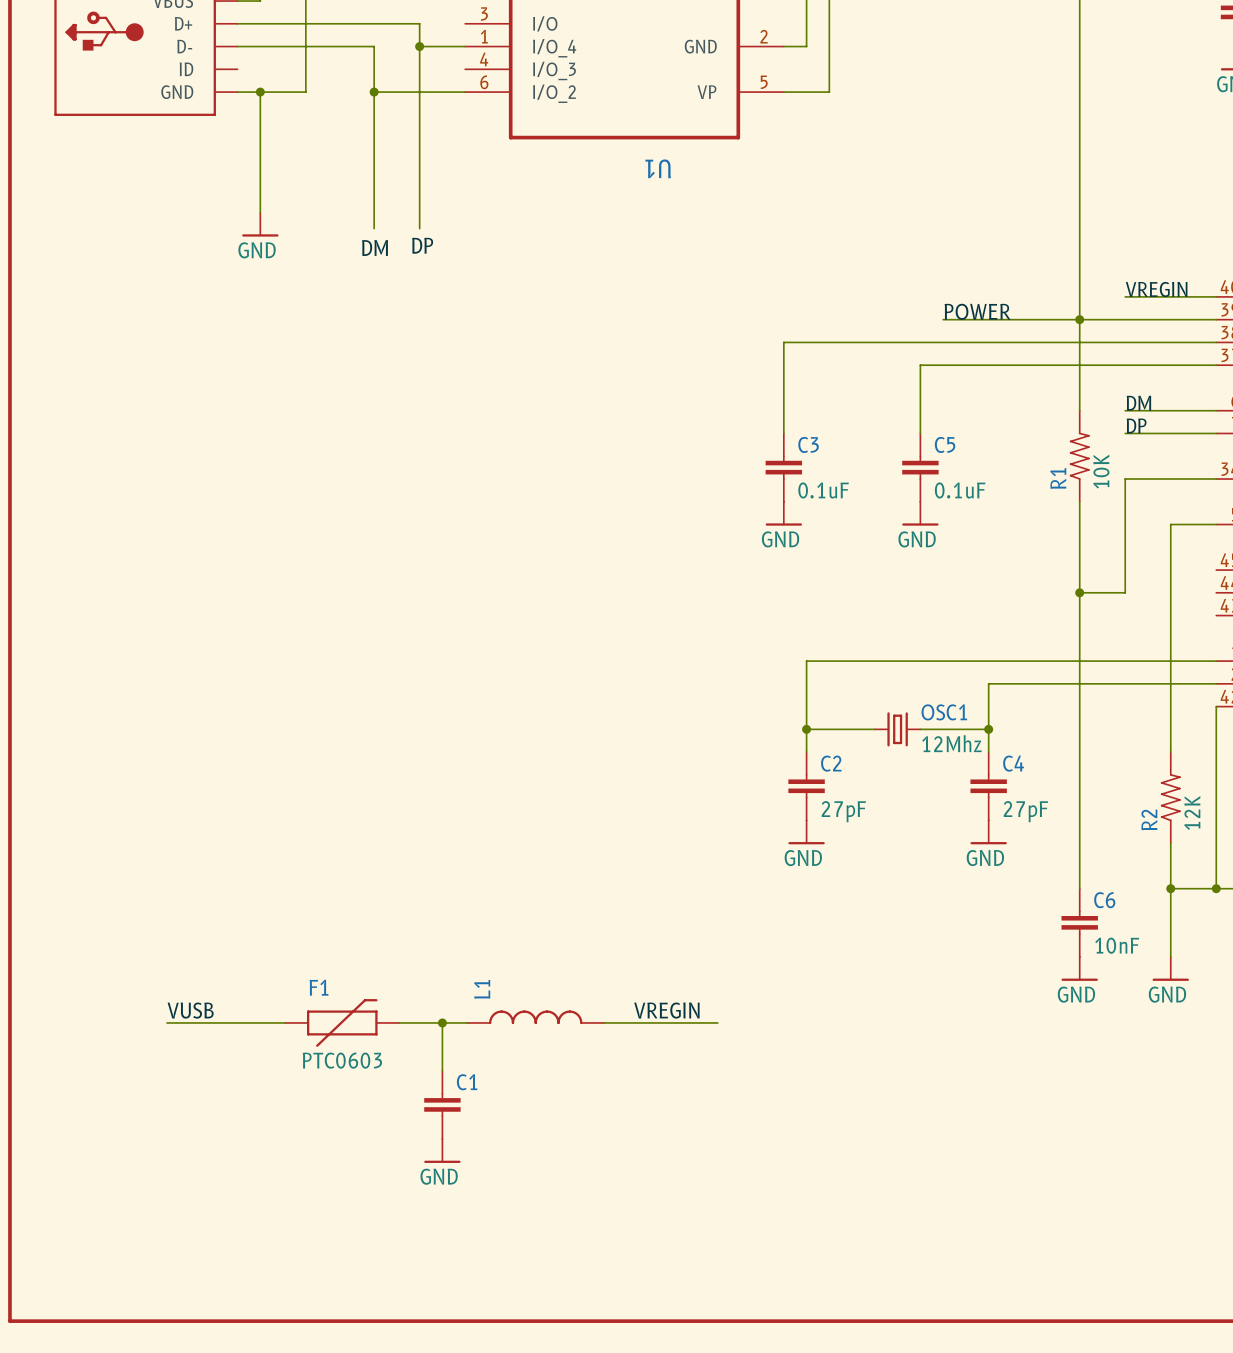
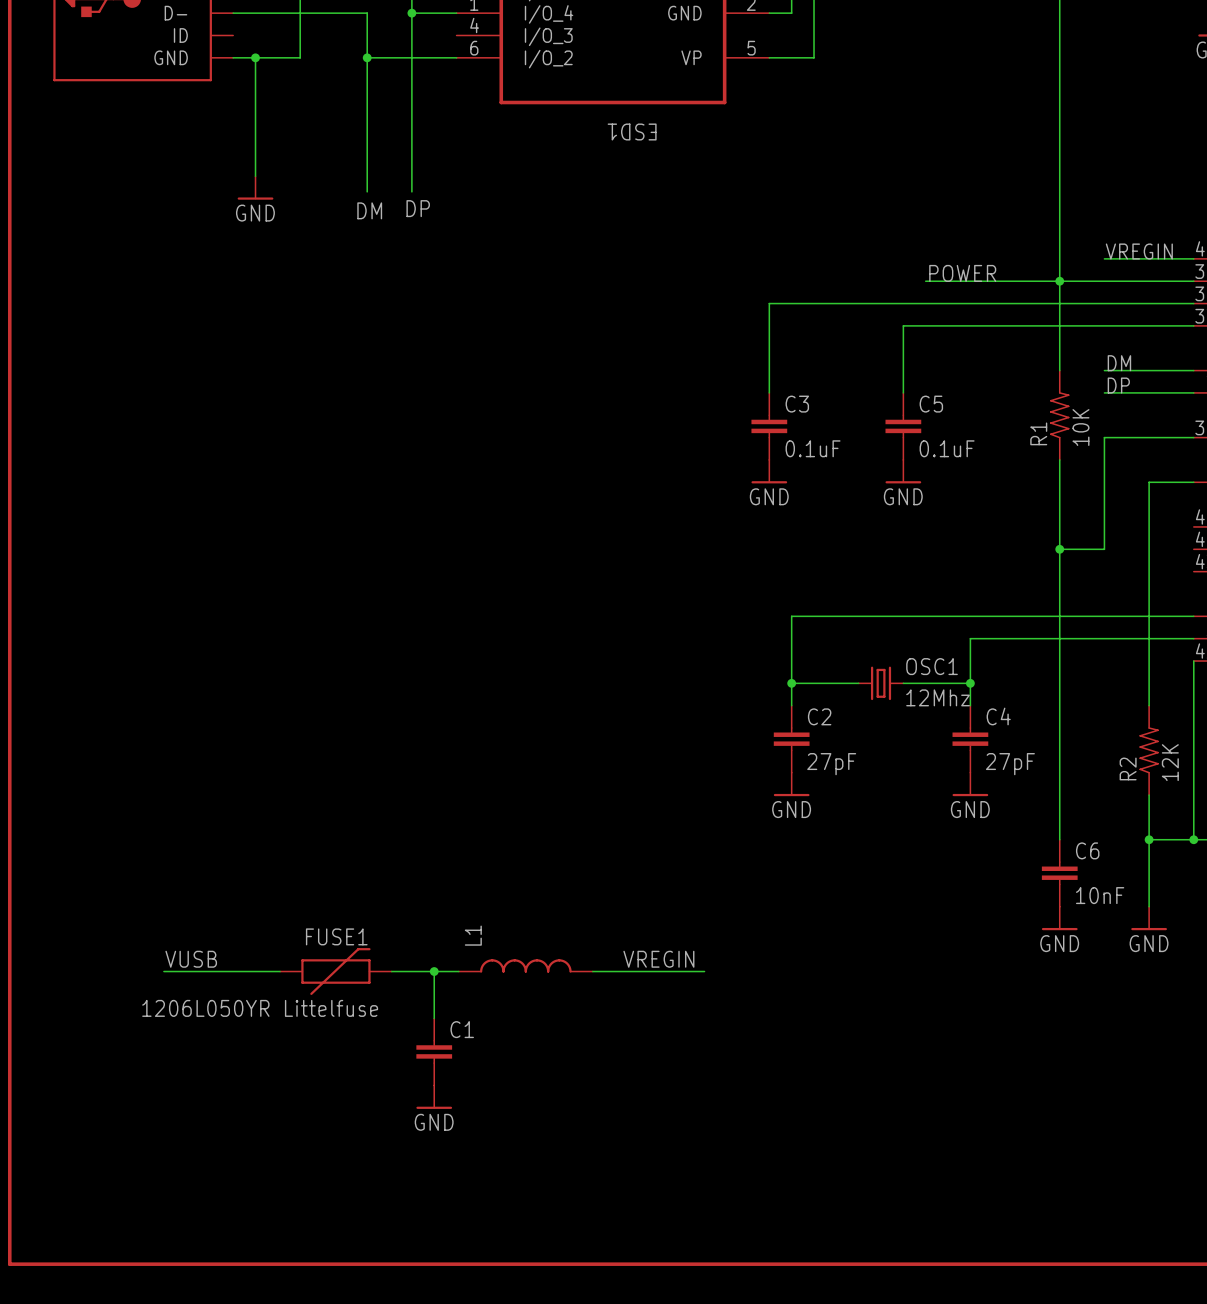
U1 name: U1 (658, 168) -> ESD1 (632, 132)
F1 name: F1 (319, 987) -> FUSE1 (336, 936)
F1 value: PTC0603 (342, 1060) -> 1206L050YR Littelfuse (260, 1008)

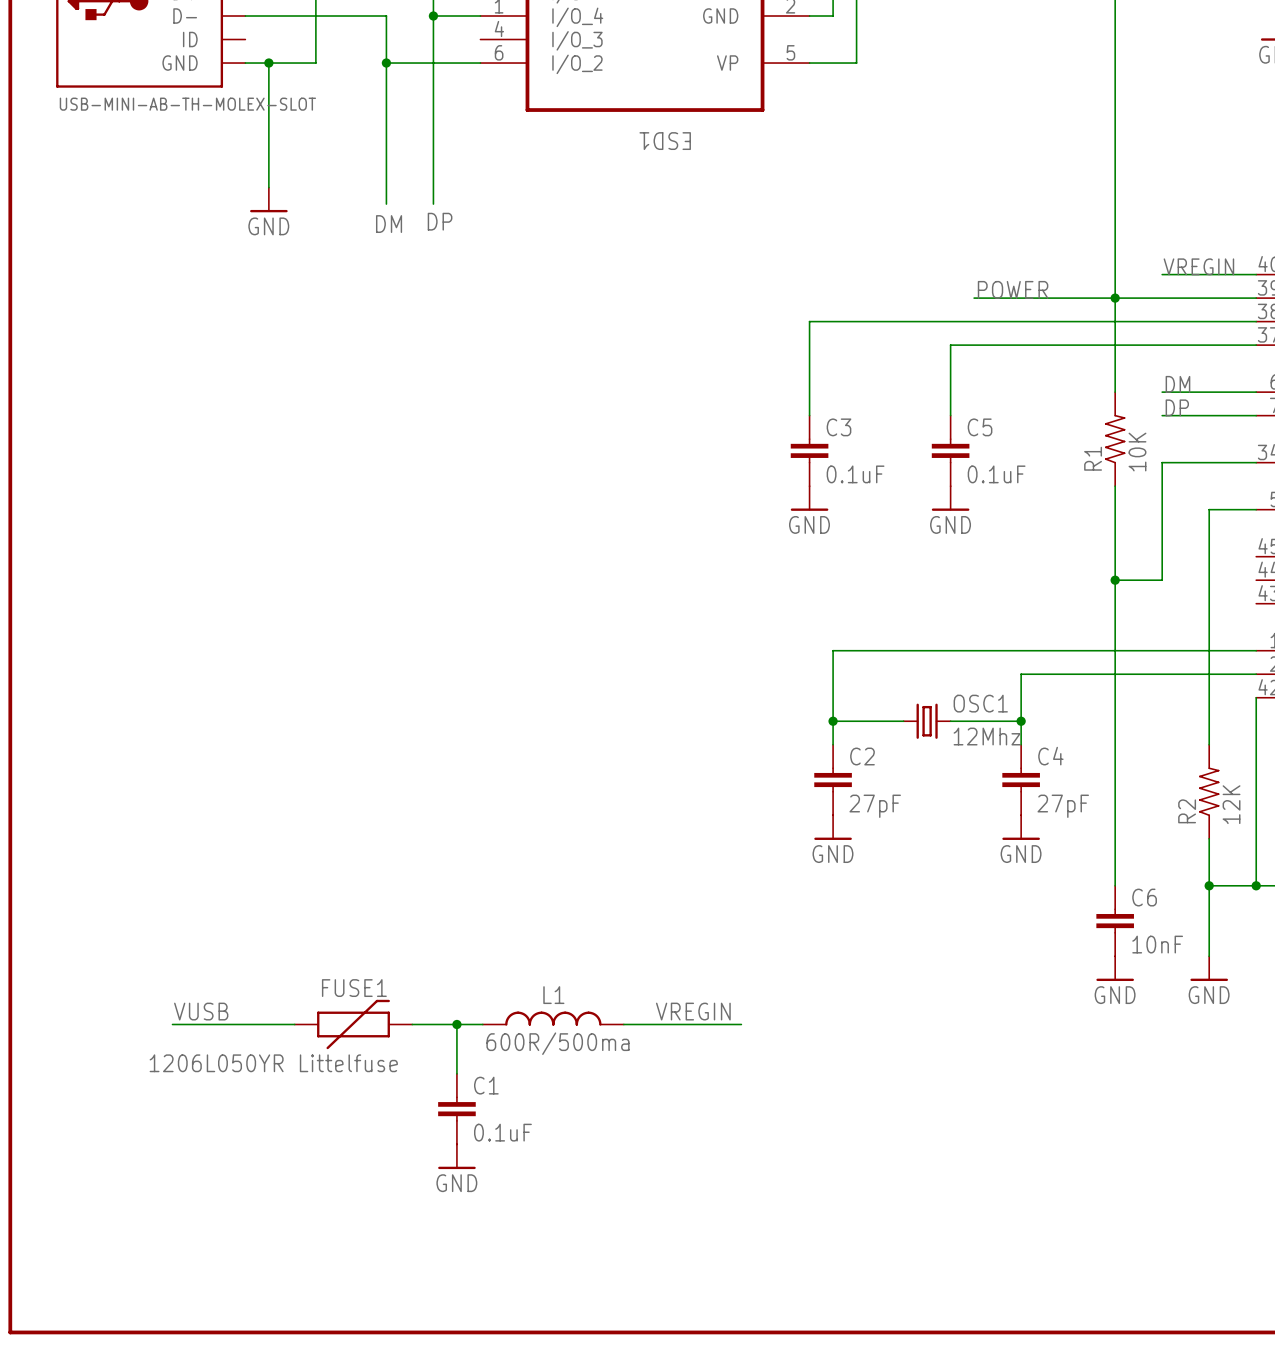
part value: none -> USB-MINI-AB-TH-MOLEX-SLOT (187, 104)
L1 name rotation: 0° (473, 935) -> 90° clockwise (553, 995)
L1 name position: L1 (473, 935) -> L1 (553, 995)
L1 value: none -> 600R/500ma (557, 1043)
C1 value: none -> 0.1uF (502, 1132)

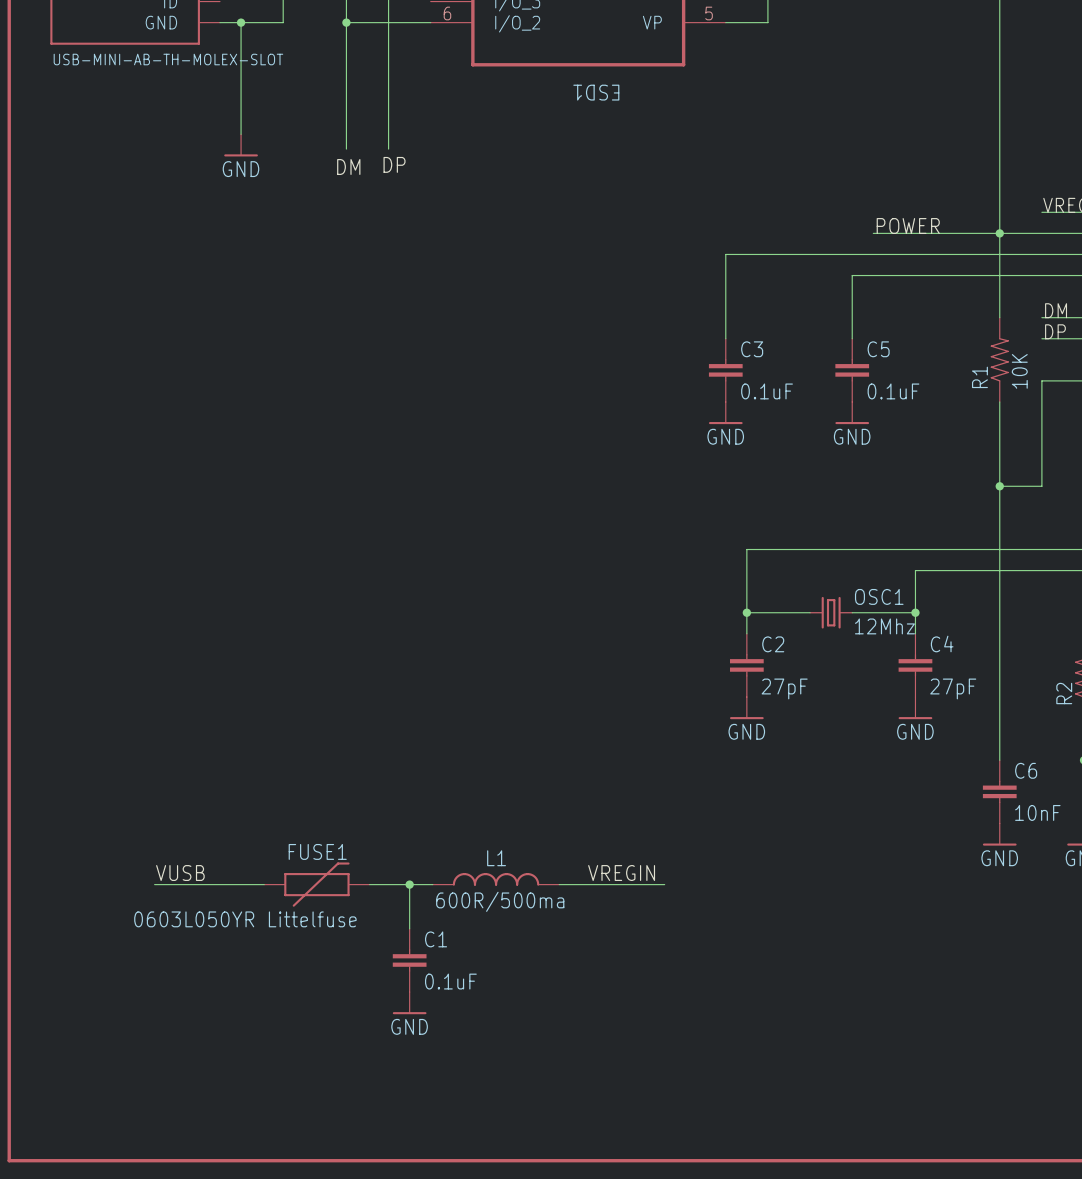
FUSE1 value: 1206L050YR Littelfuse (273, 1063) -> 0603L050YR Littelfuse (245, 919)

